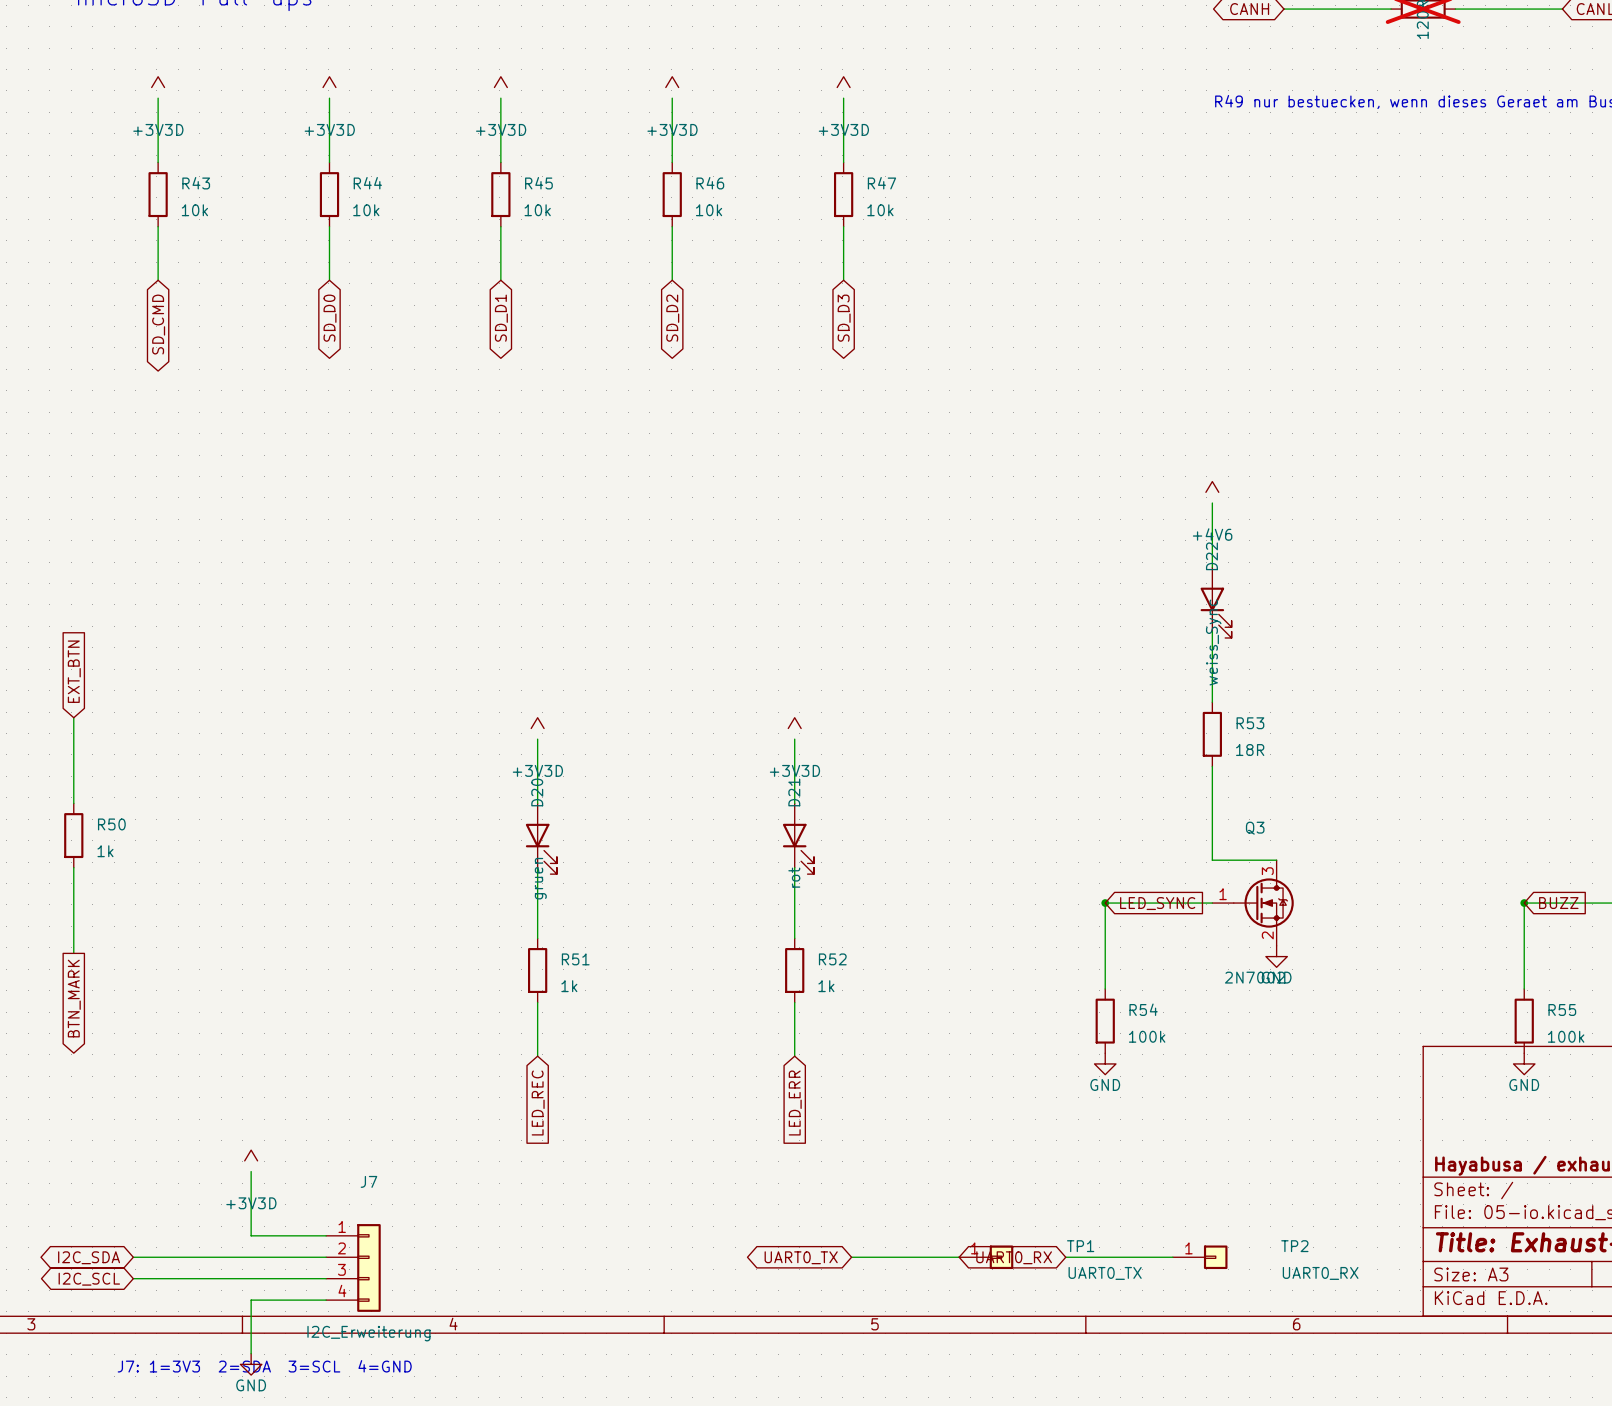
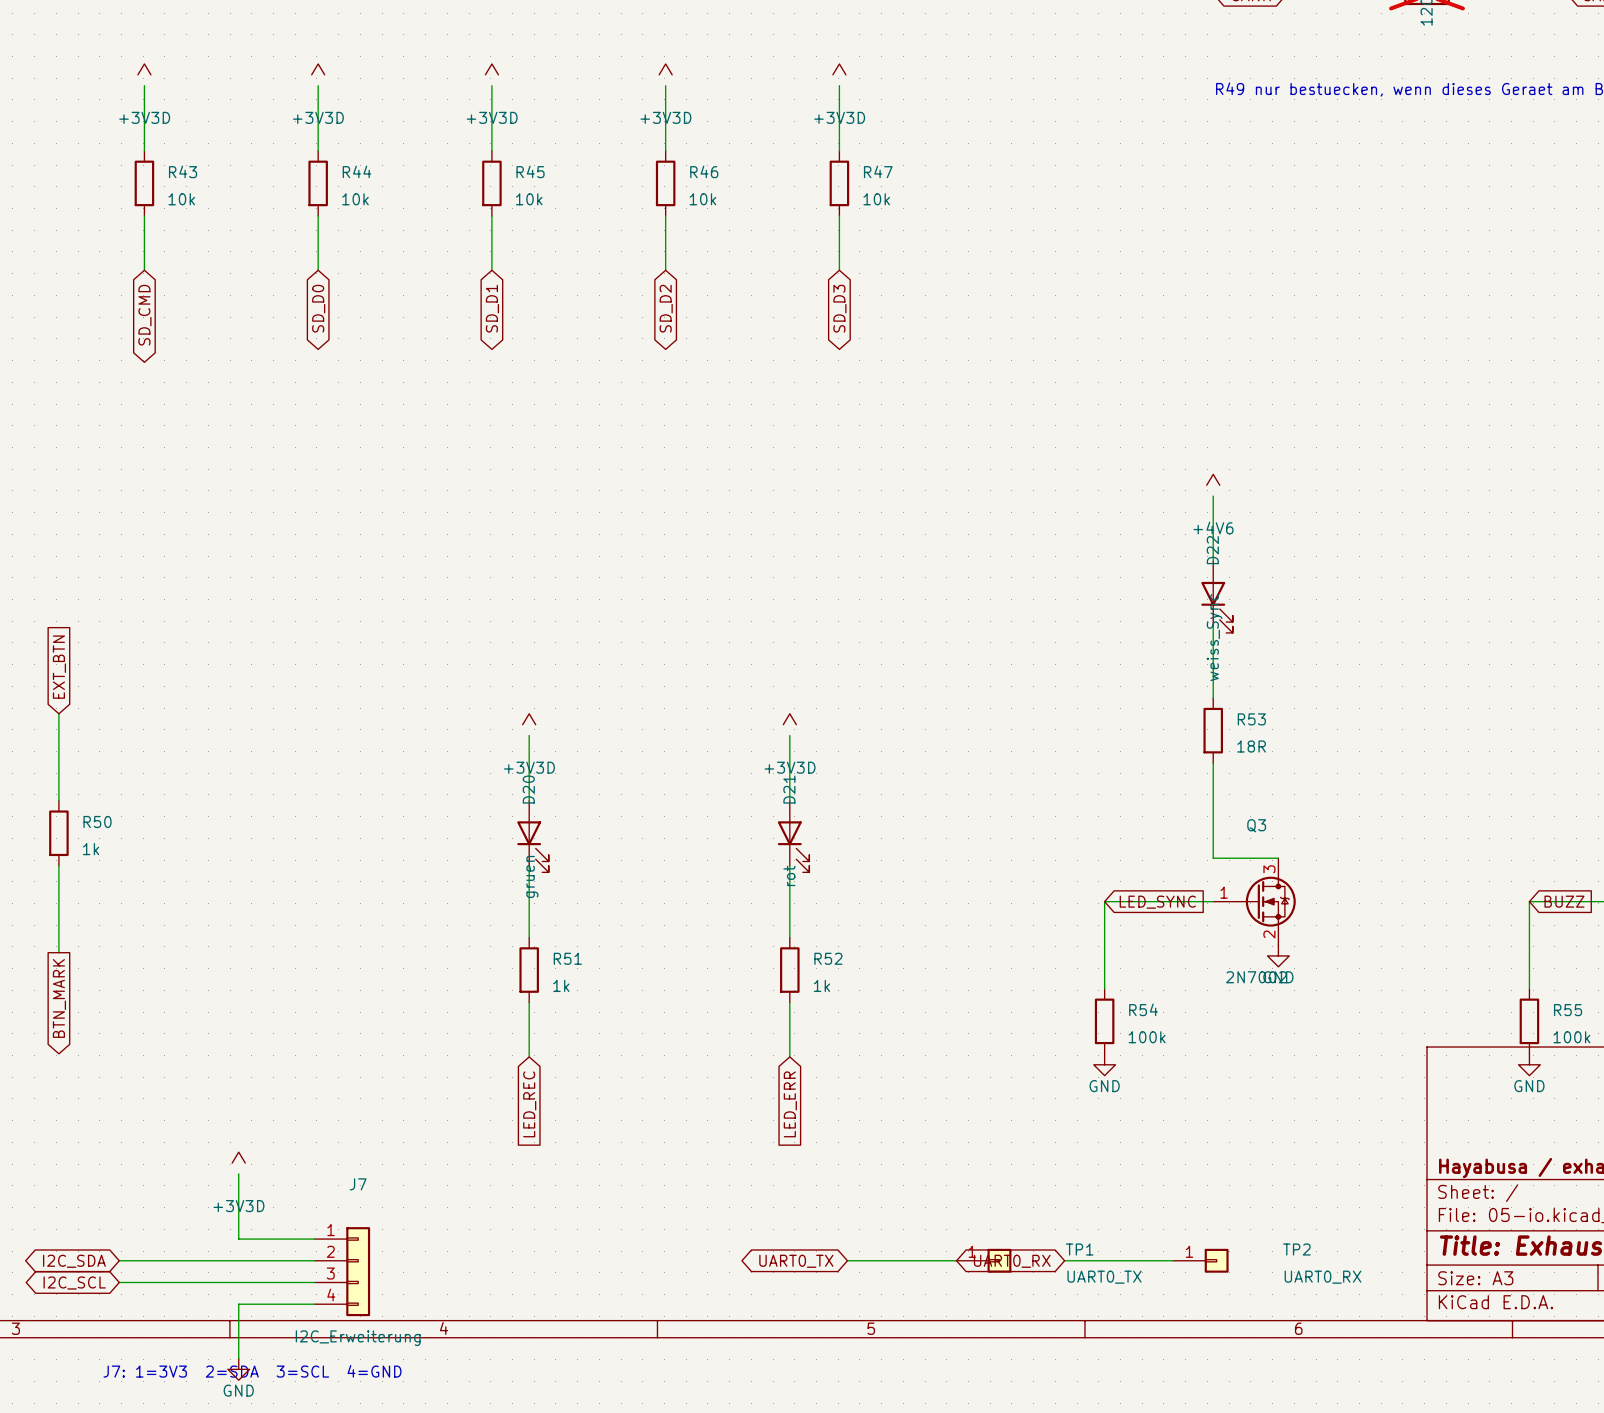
junction: (1105, 903) -> none
junction: (1524, 903) -> none

